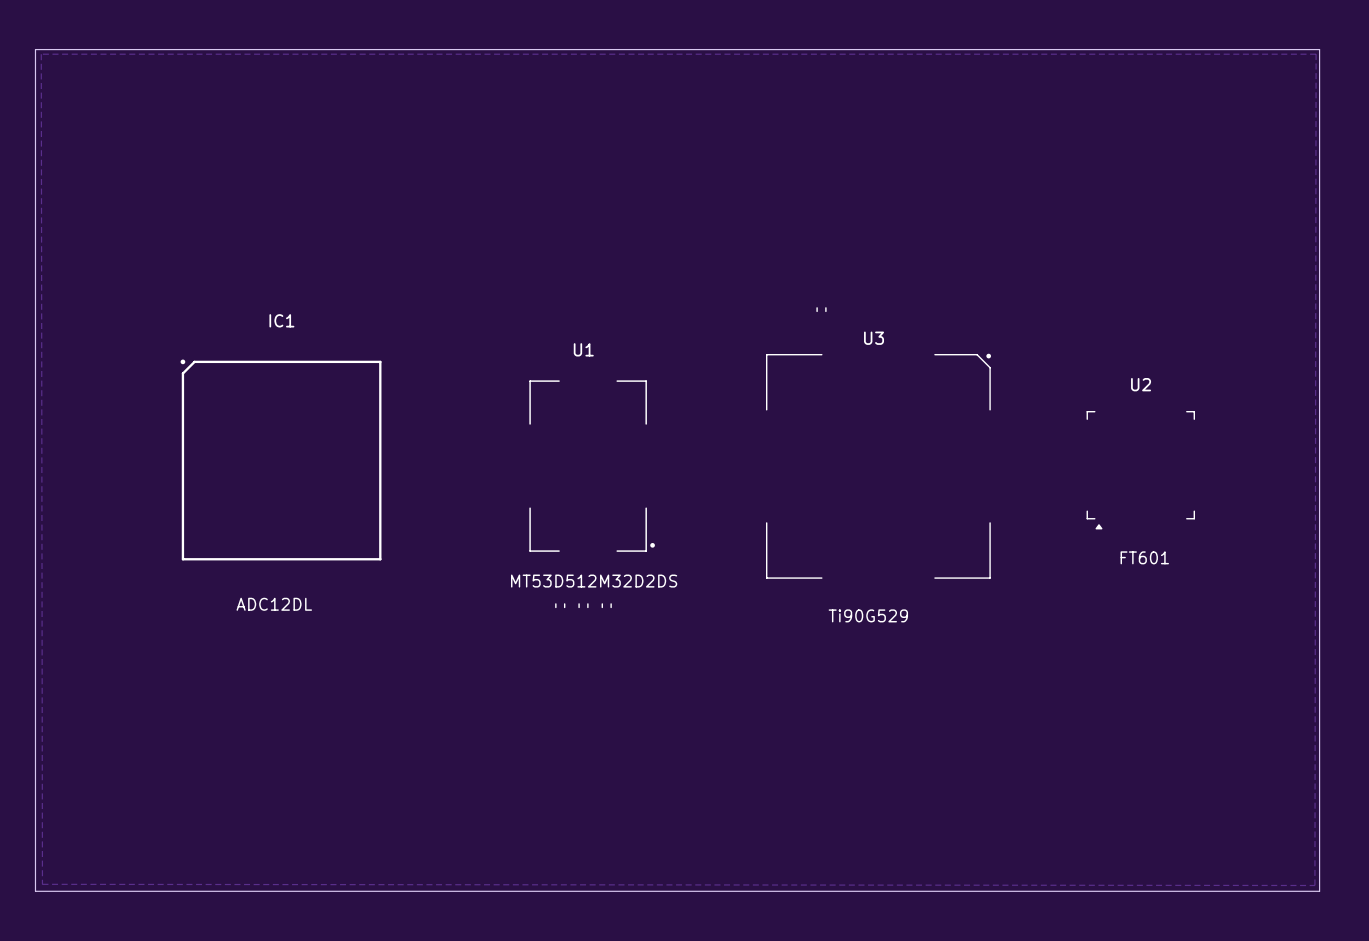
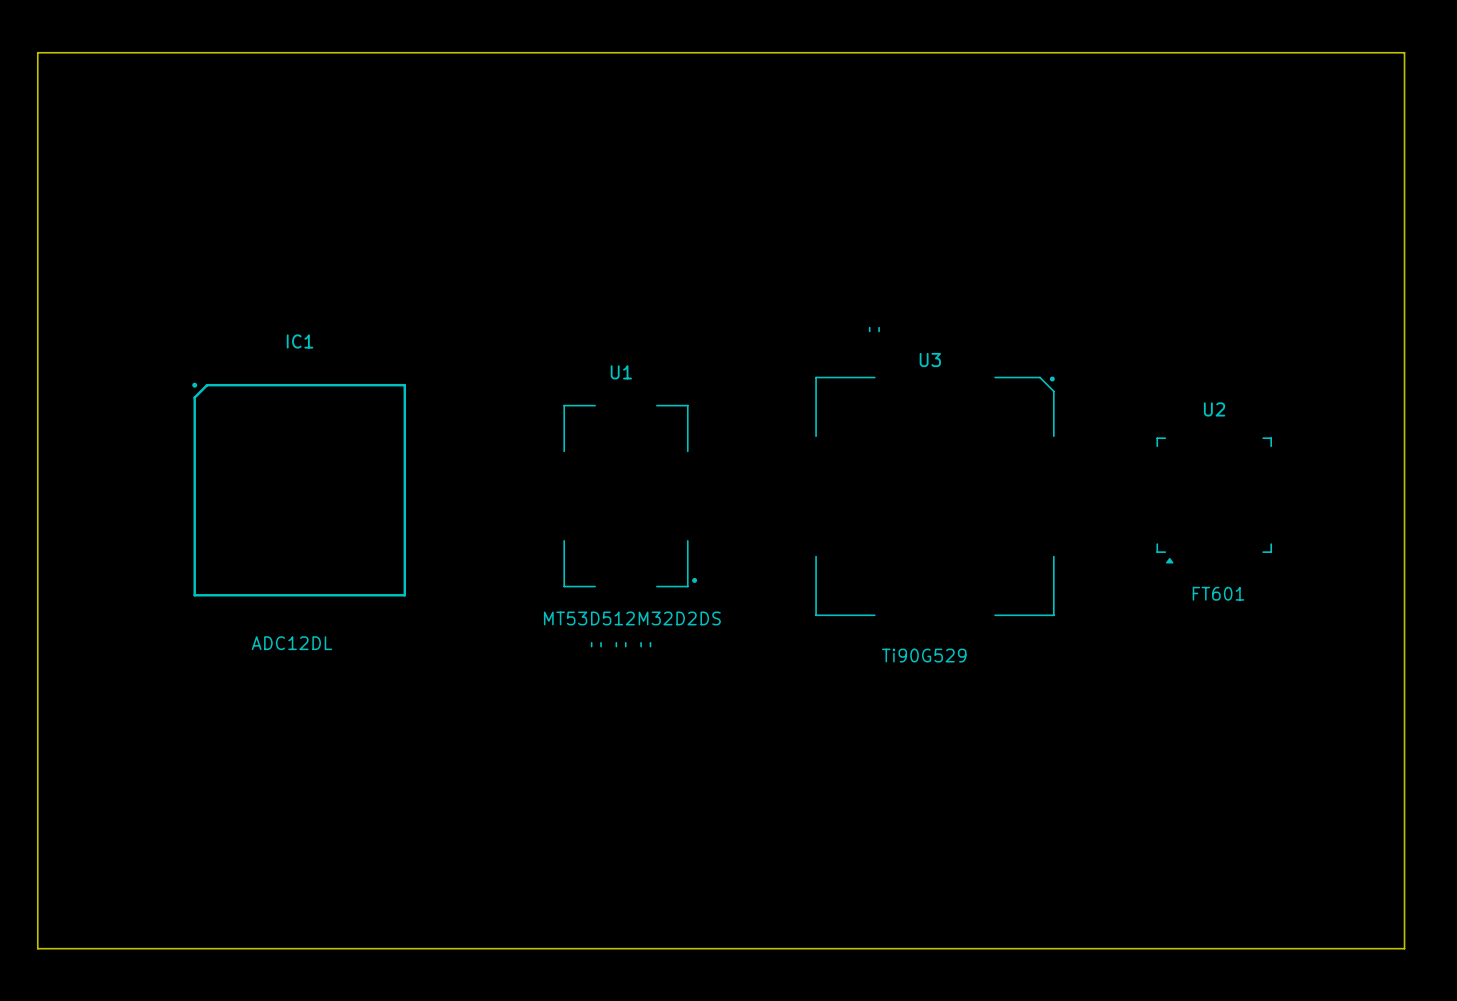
zone outline: (41, 54) (42, 884) (1314, 885) (1316, 54) (41, 54) -> none

